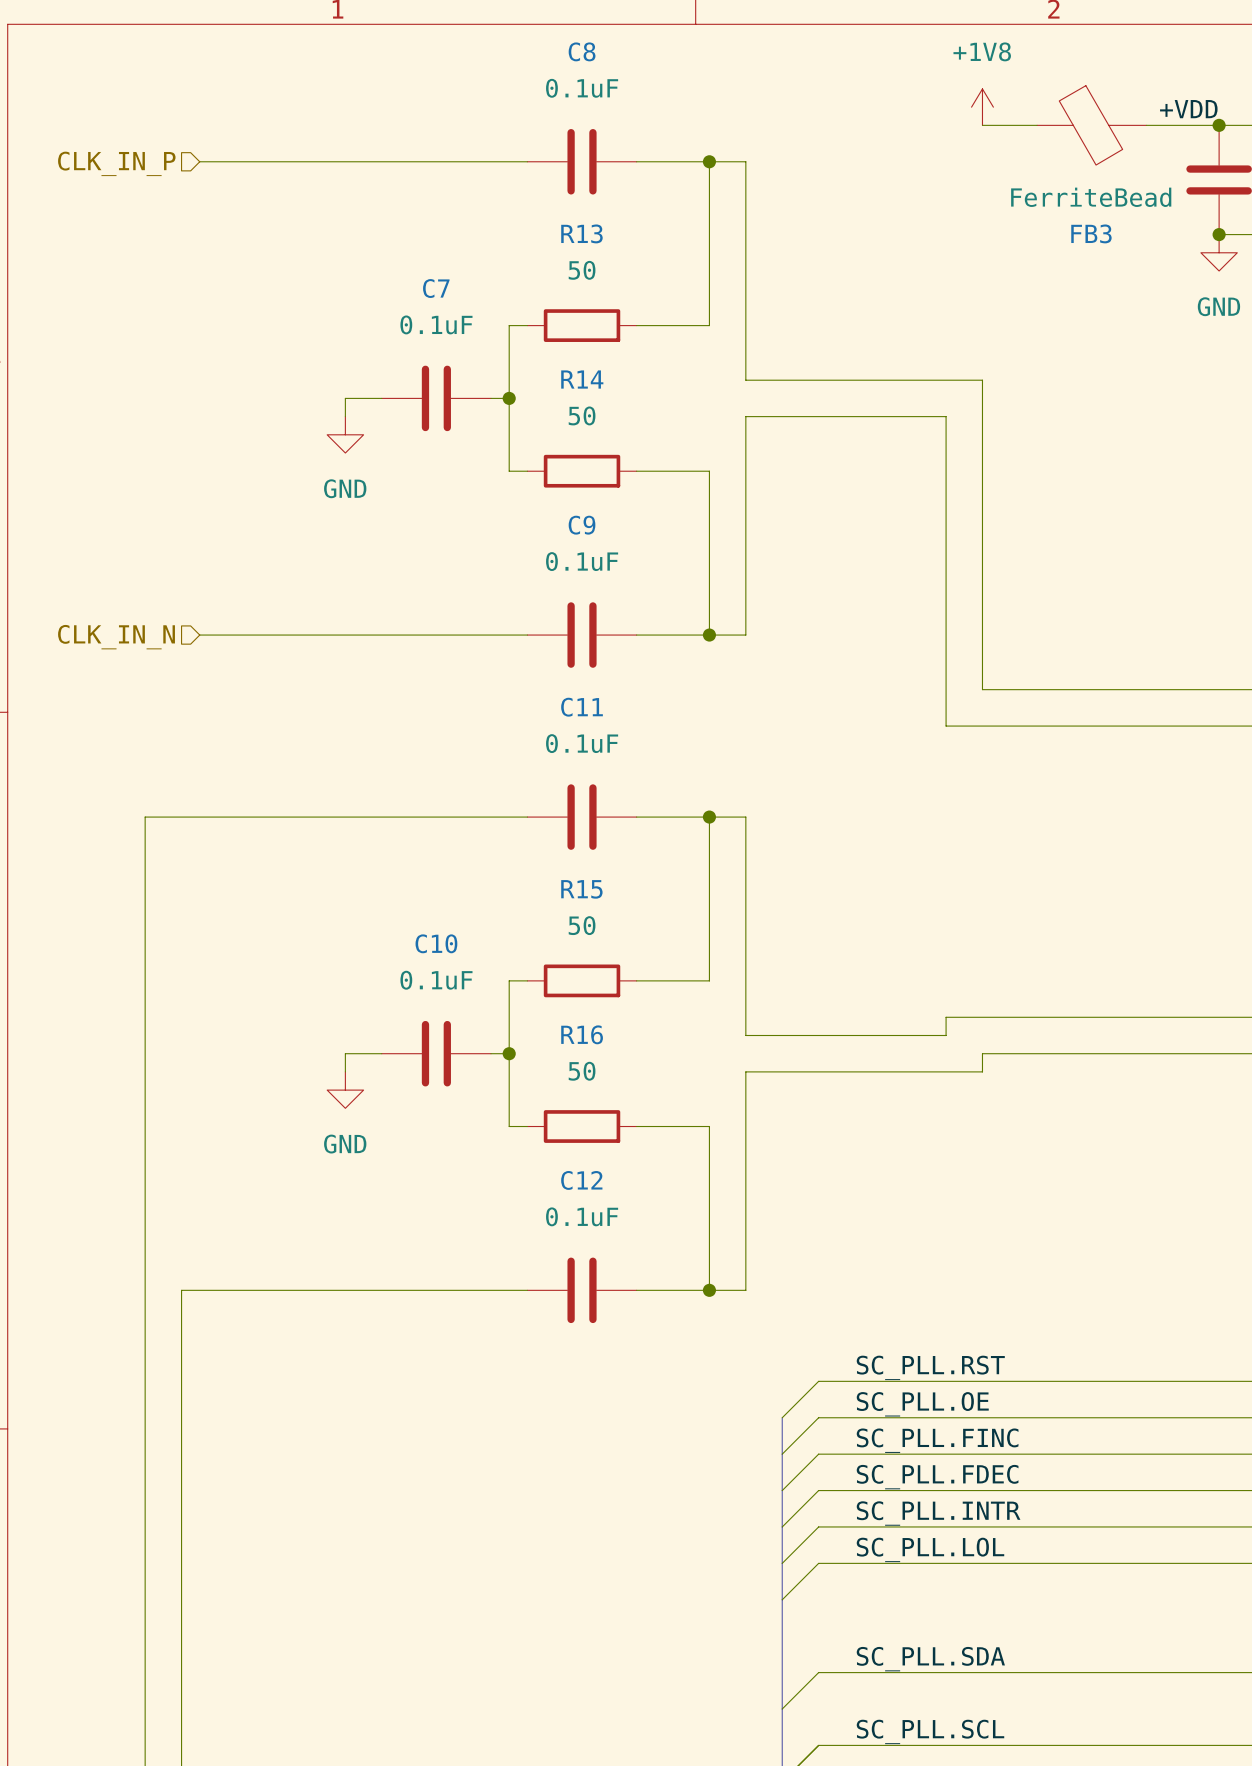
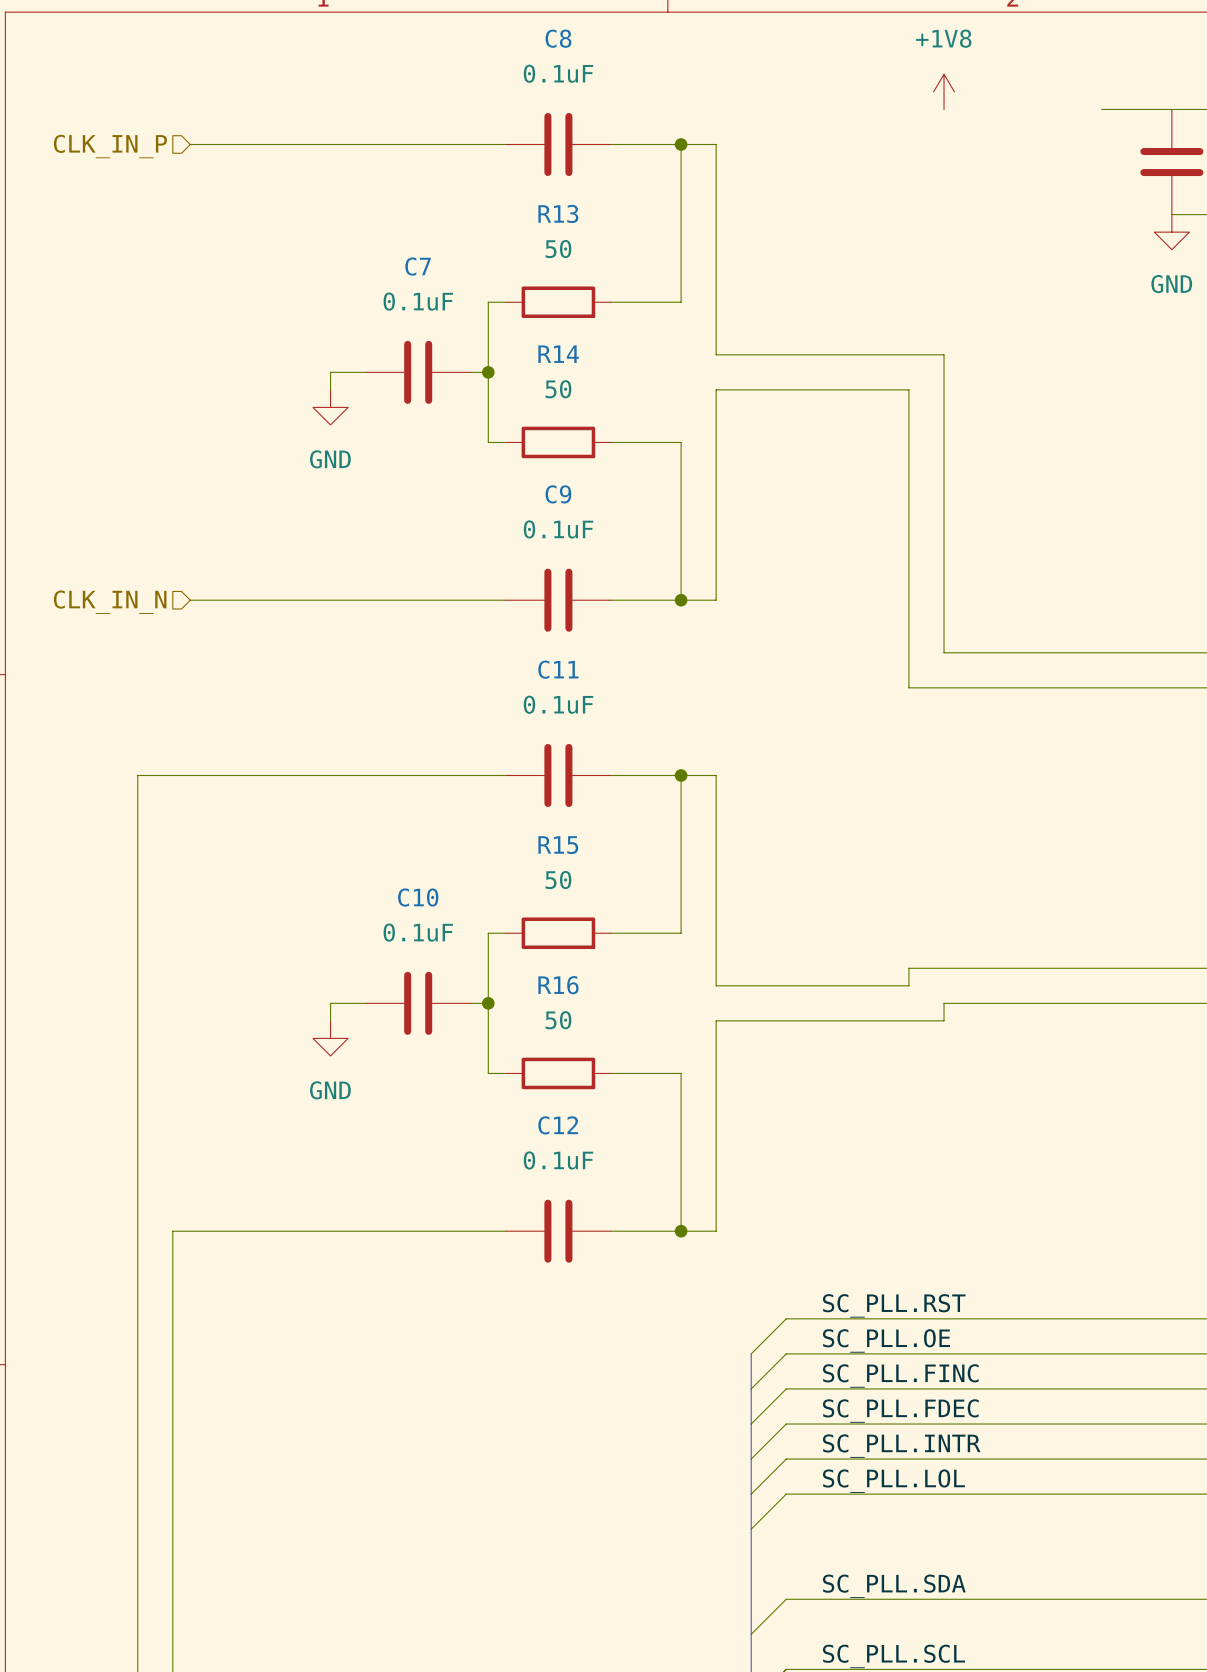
label: +VDD (1188, 109) -> none
wire: (982, 125) (1037, 125) -> none
FB3: FerriteBead (1091, 125) -> none
junction: (1219, 125) -> none
junction: (1219, 234) -> none

